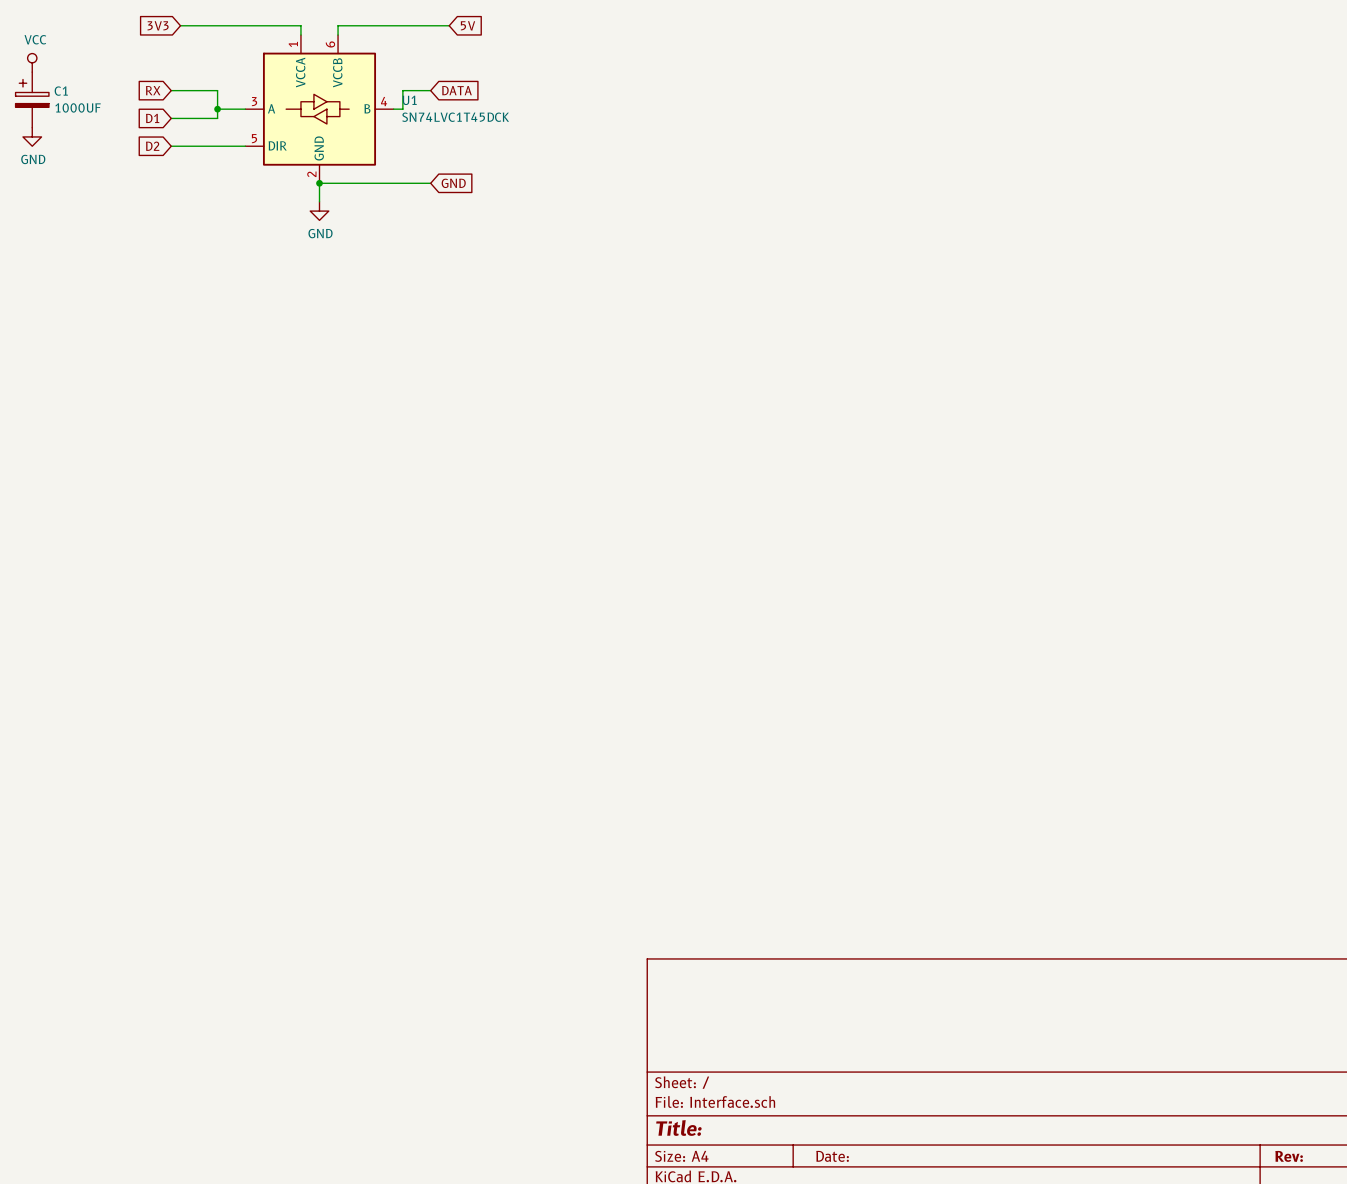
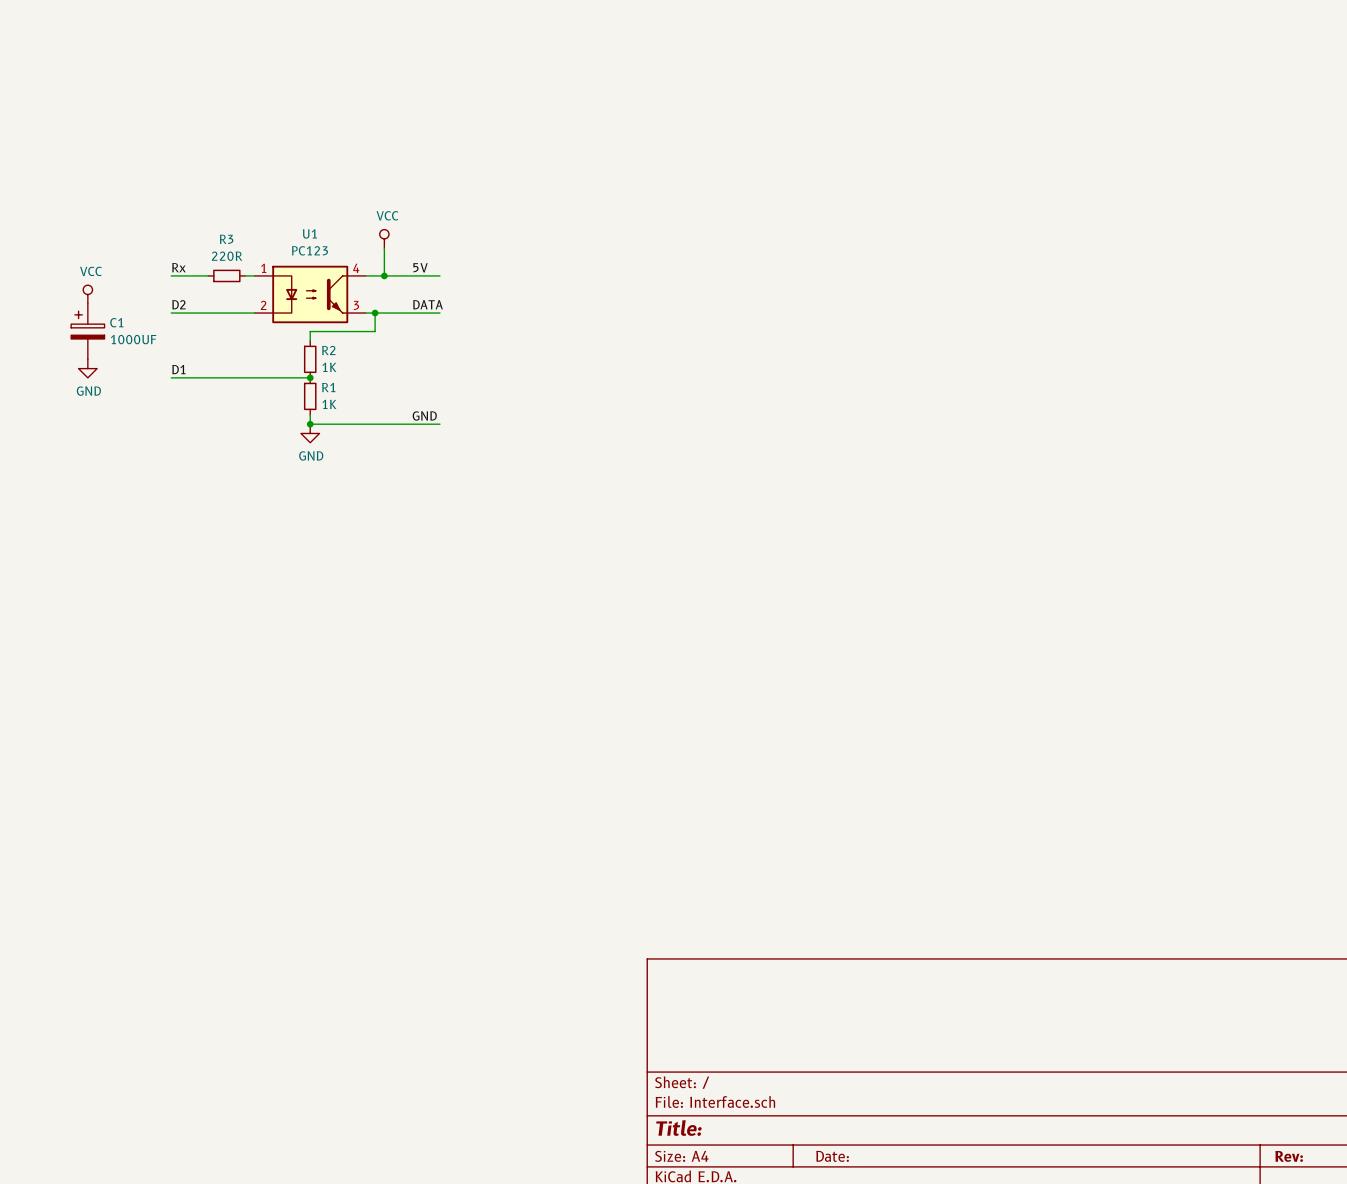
global label: 3V3 (158, 25) -> none
wire: (180, 25) (300, 25) (300, 35) -> none
wire: (449, 25) (338, 25) (338, 35) -> none
global label: 5V (468, 25) -> none
U1 symbol: [245, 35, 394, 184] -> [254, 265, 366, 324]
power symbol: VCC (32, 62) -> none
global label: RX (153, 90) -> none
wire: (171, 90) (217, 90) (217, 118) (171, 118) -> none
wire: (430, 90) (402, 90) (402, 109) (393, 109) -> none
global label: DATA (456, 90) -> none
C1 position: (32, 99) -> (87, 331)
U1 name position: U1 (409, 100) -> U1 (309, 233)
wire: (217, 109) (245, 109) -> none
junction: (217, 109) -> none
U1 value: SN74LVC1T45DCK (455, 117) -> PC123 (309, 250)
global label: D1 (152, 118) -> none
power symbol: GND (32, 136) -> none
global label: D2 (152, 146) -> none
wire: (171, 146) (245, 146) -> none
junction: (319, 183) -> none
wire: (430, 183) (319, 183) (319, 201) -> none
global label: GND (453, 183) -> none
power symbol: GND (319, 211) -> none
power symbol: none -> VCC (384, 238)
wire: none -> (384, 248) (384, 275)
label: none -> Rx (178, 267)
label: none -> 5V (420, 267)
wire: none -> (171, 275) (208, 275)
R3: none -> 220R (226, 275)
wire: none -> (245, 275) (254, 275)
wire: none -> (365, 275) (439, 275)
junction: none -> (384, 275)
power symbol: none -> VCC (87, 294)
label: none -> D2 (178, 304)
label: none -> DATA (428, 304)
wire: none -> (171, 313) (254, 313)
wire: none -> (365, 313) (439, 313)
wire: none -> (375, 313) (375, 331) (310, 331) (310, 340)
junction: none -> (375, 313)
R2: none -> 1K (310, 359)
power symbol: none -> GND (87, 368)
label: none -> D1 (178, 369)
wire: none -> (171, 377) (310, 377)
junction: none -> (310, 377)
R1: none -> 1K (310, 396)
wire: none -> (310, 414) (310, 424) (439, 424)
label: none -> GND (424, 415)
junction: none -> (310, 424)
power symbol: none -> GND (310, 433)

